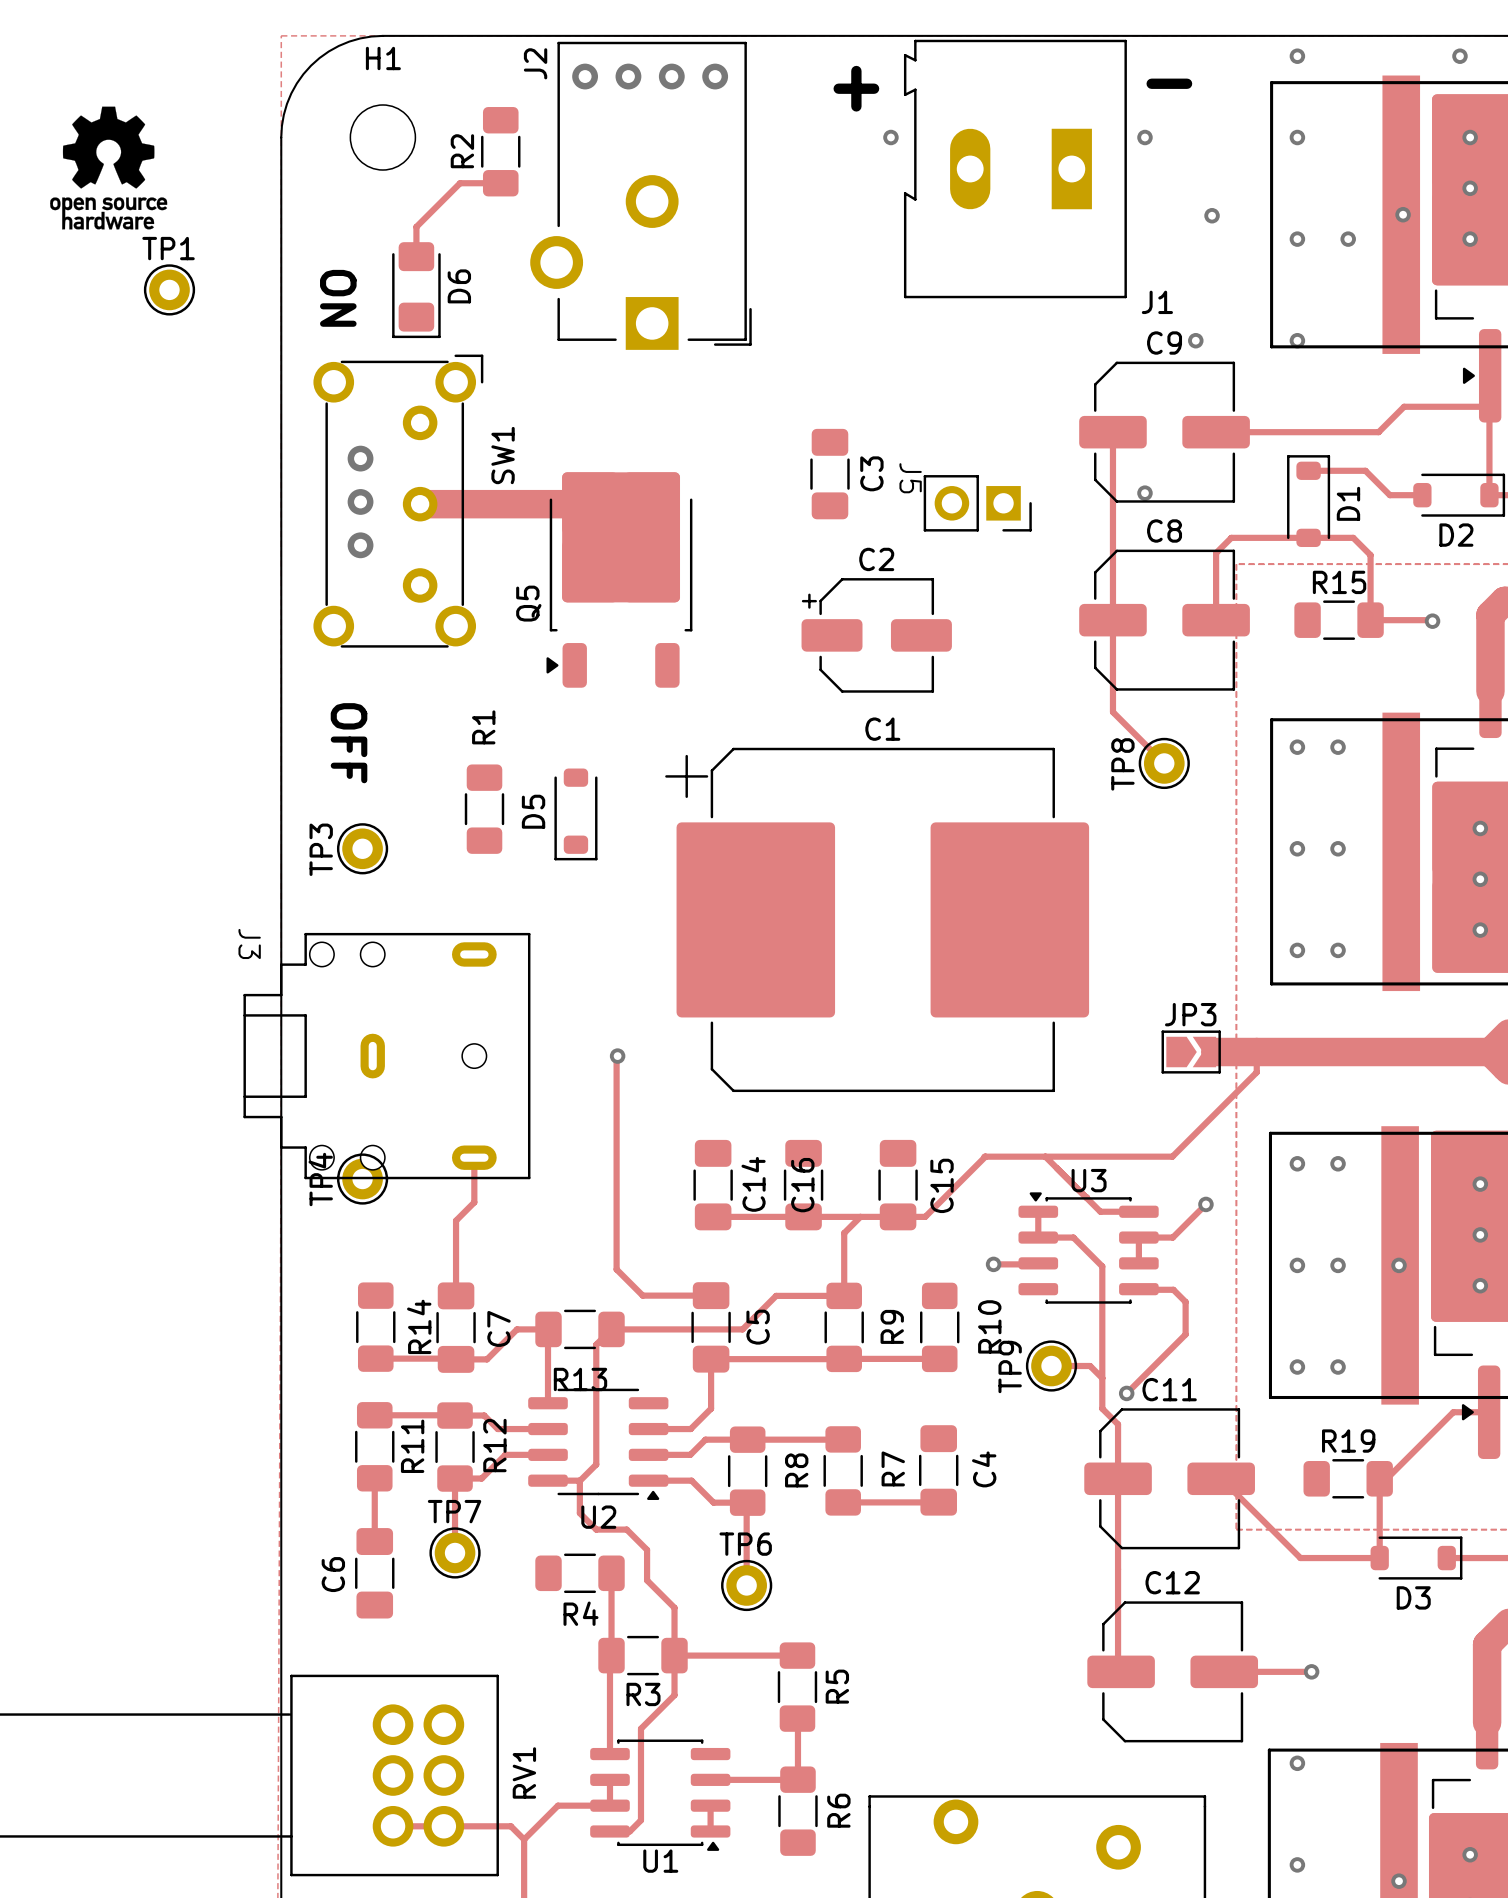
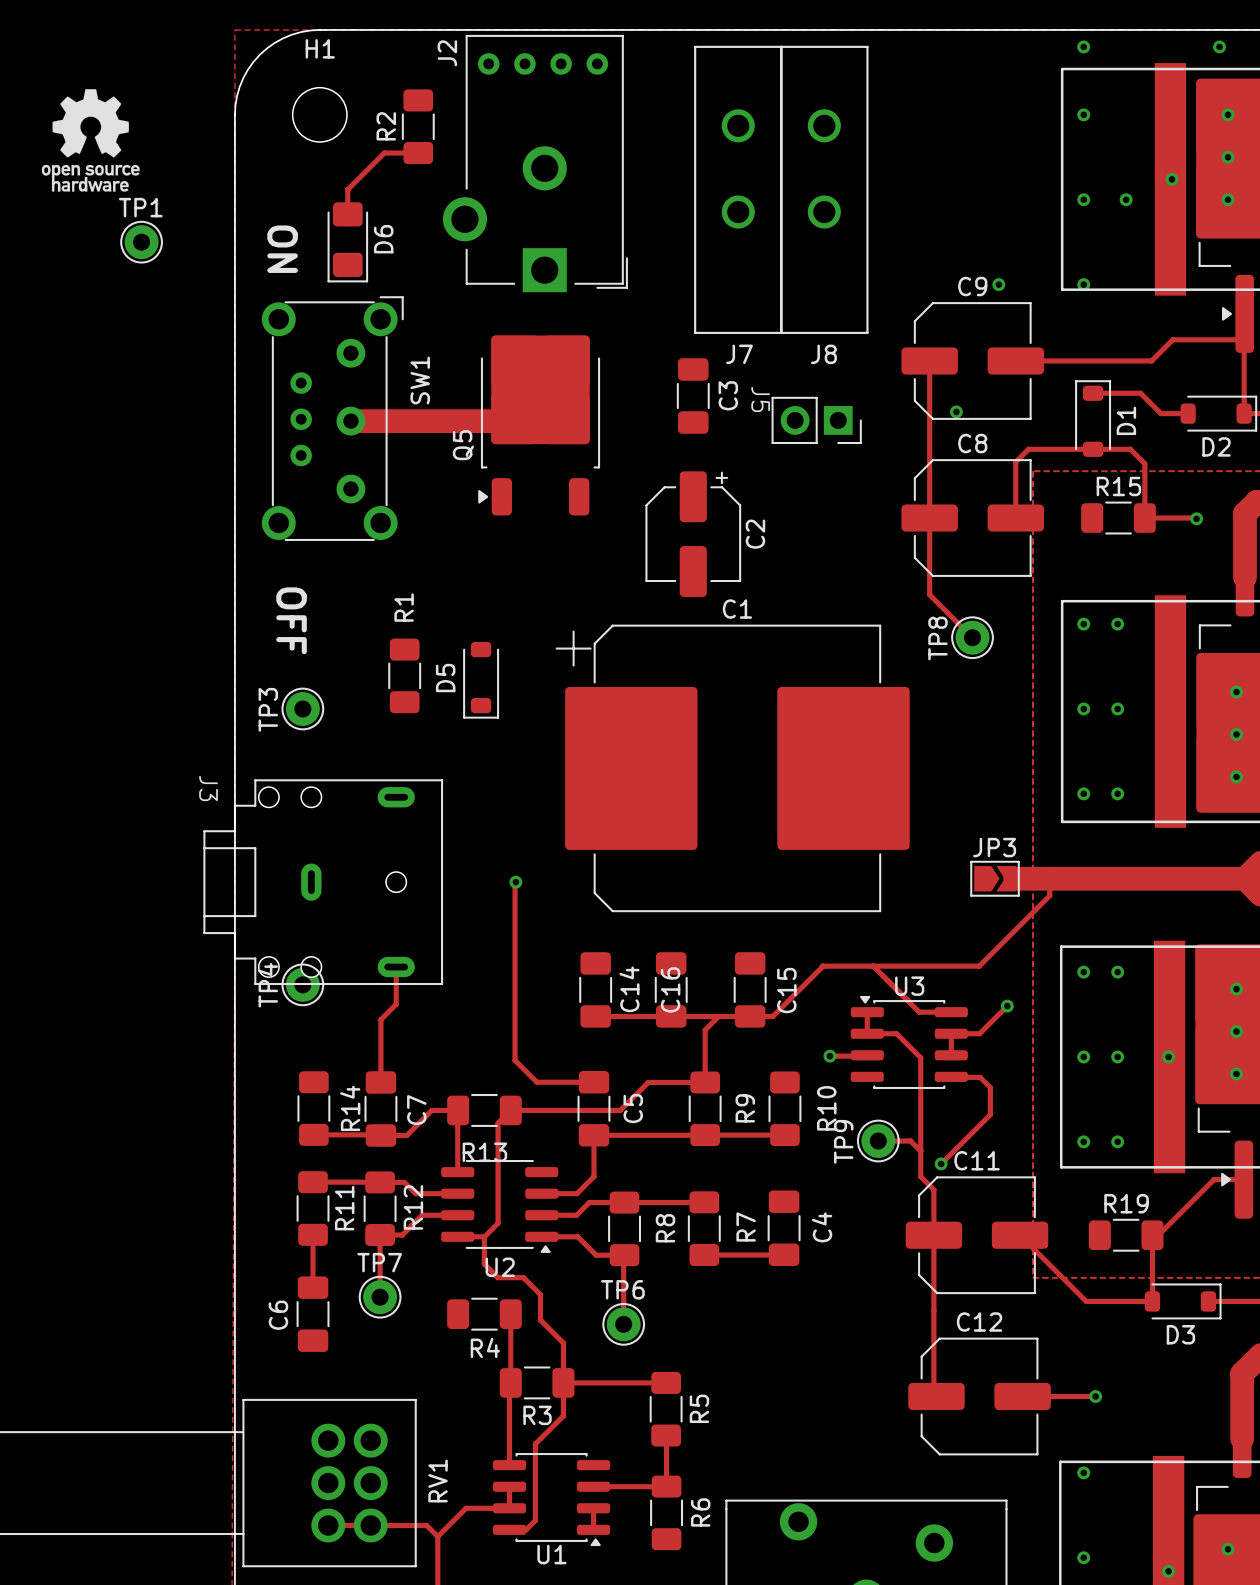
text: - (1169, 83) -> none
text: + (856, 88) -> none
via: (890, 137) -> none
via: (1144, 137) -> none
J1: (1015, 169) -> none
via: (1212, 215) -> none
J7: none -> (738, 189)
J8: none -> (824, 189)
Q5 position: (619, 580) -> (539, 425)
C2 rotation: 0° (876, 635) -> 90° clockwise (693, 534)

